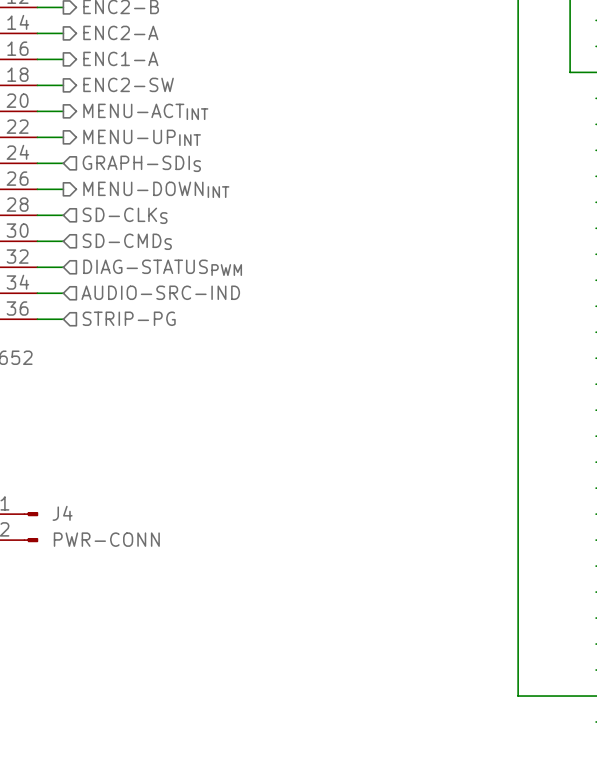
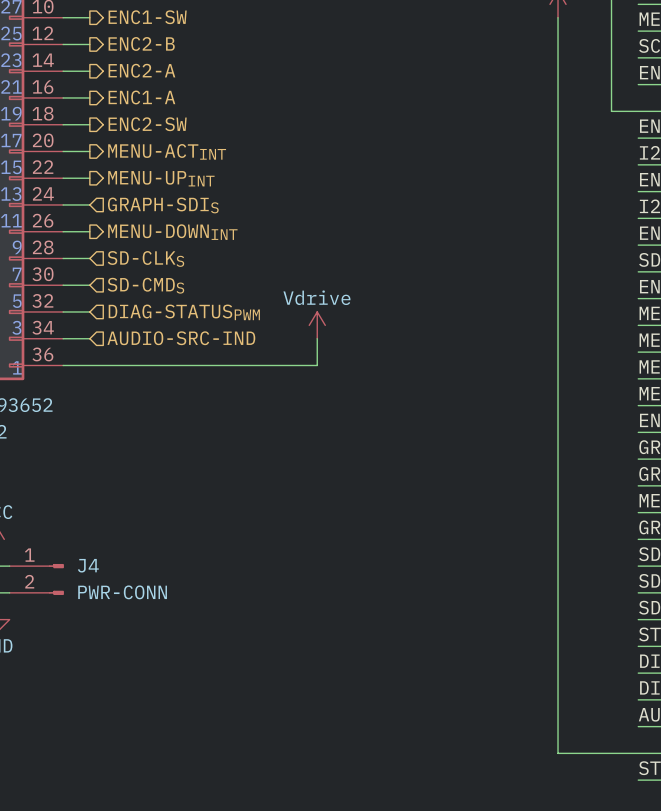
power symbol: none -> Vdrive (317, 325)
wire: none -> (317, 338) (317, 365) (89, 365)
hierarchical label: STRIP-PG (129, 318) -> none

